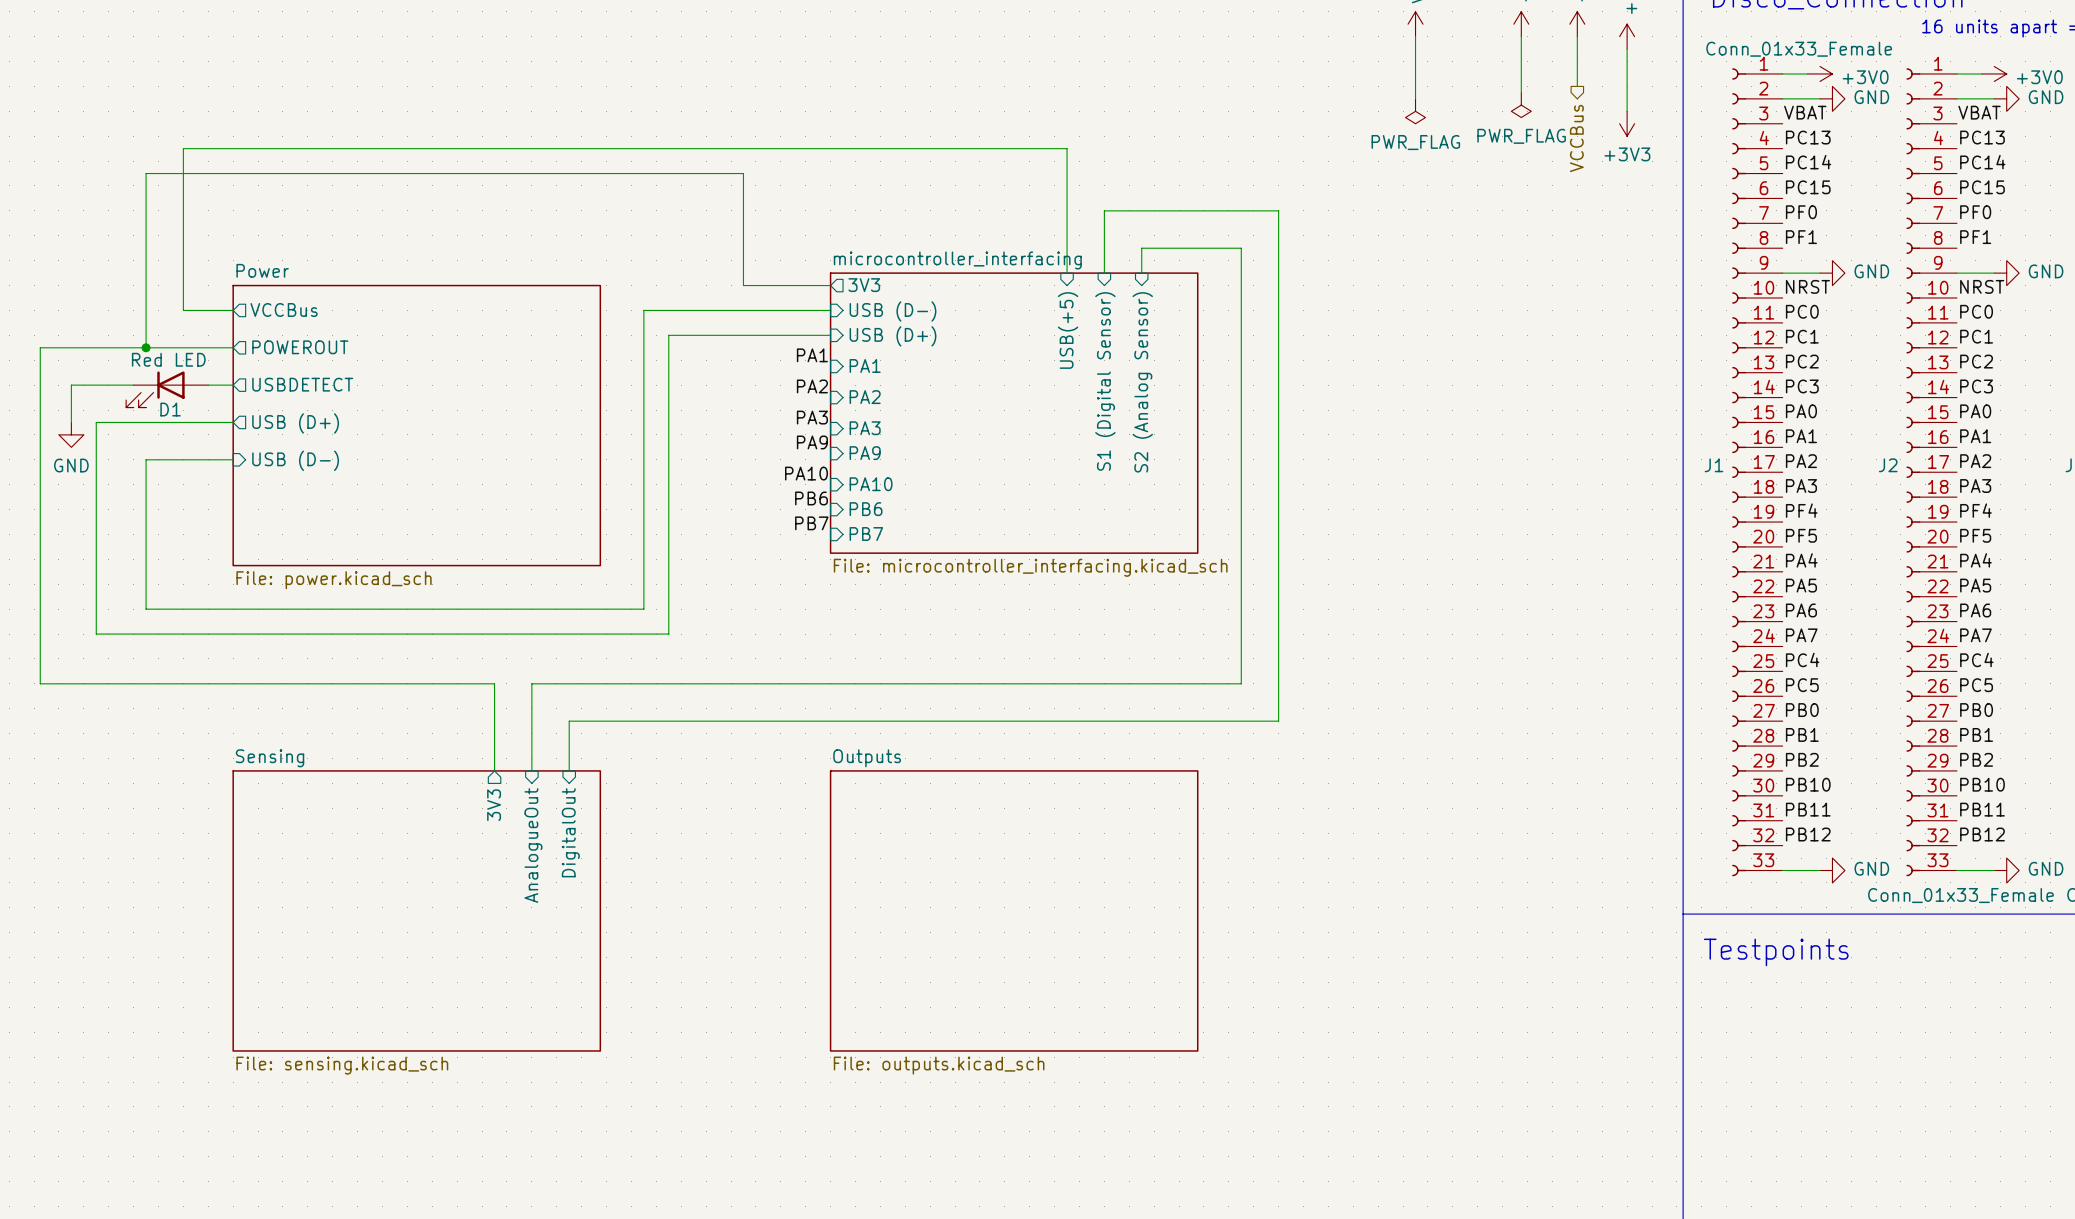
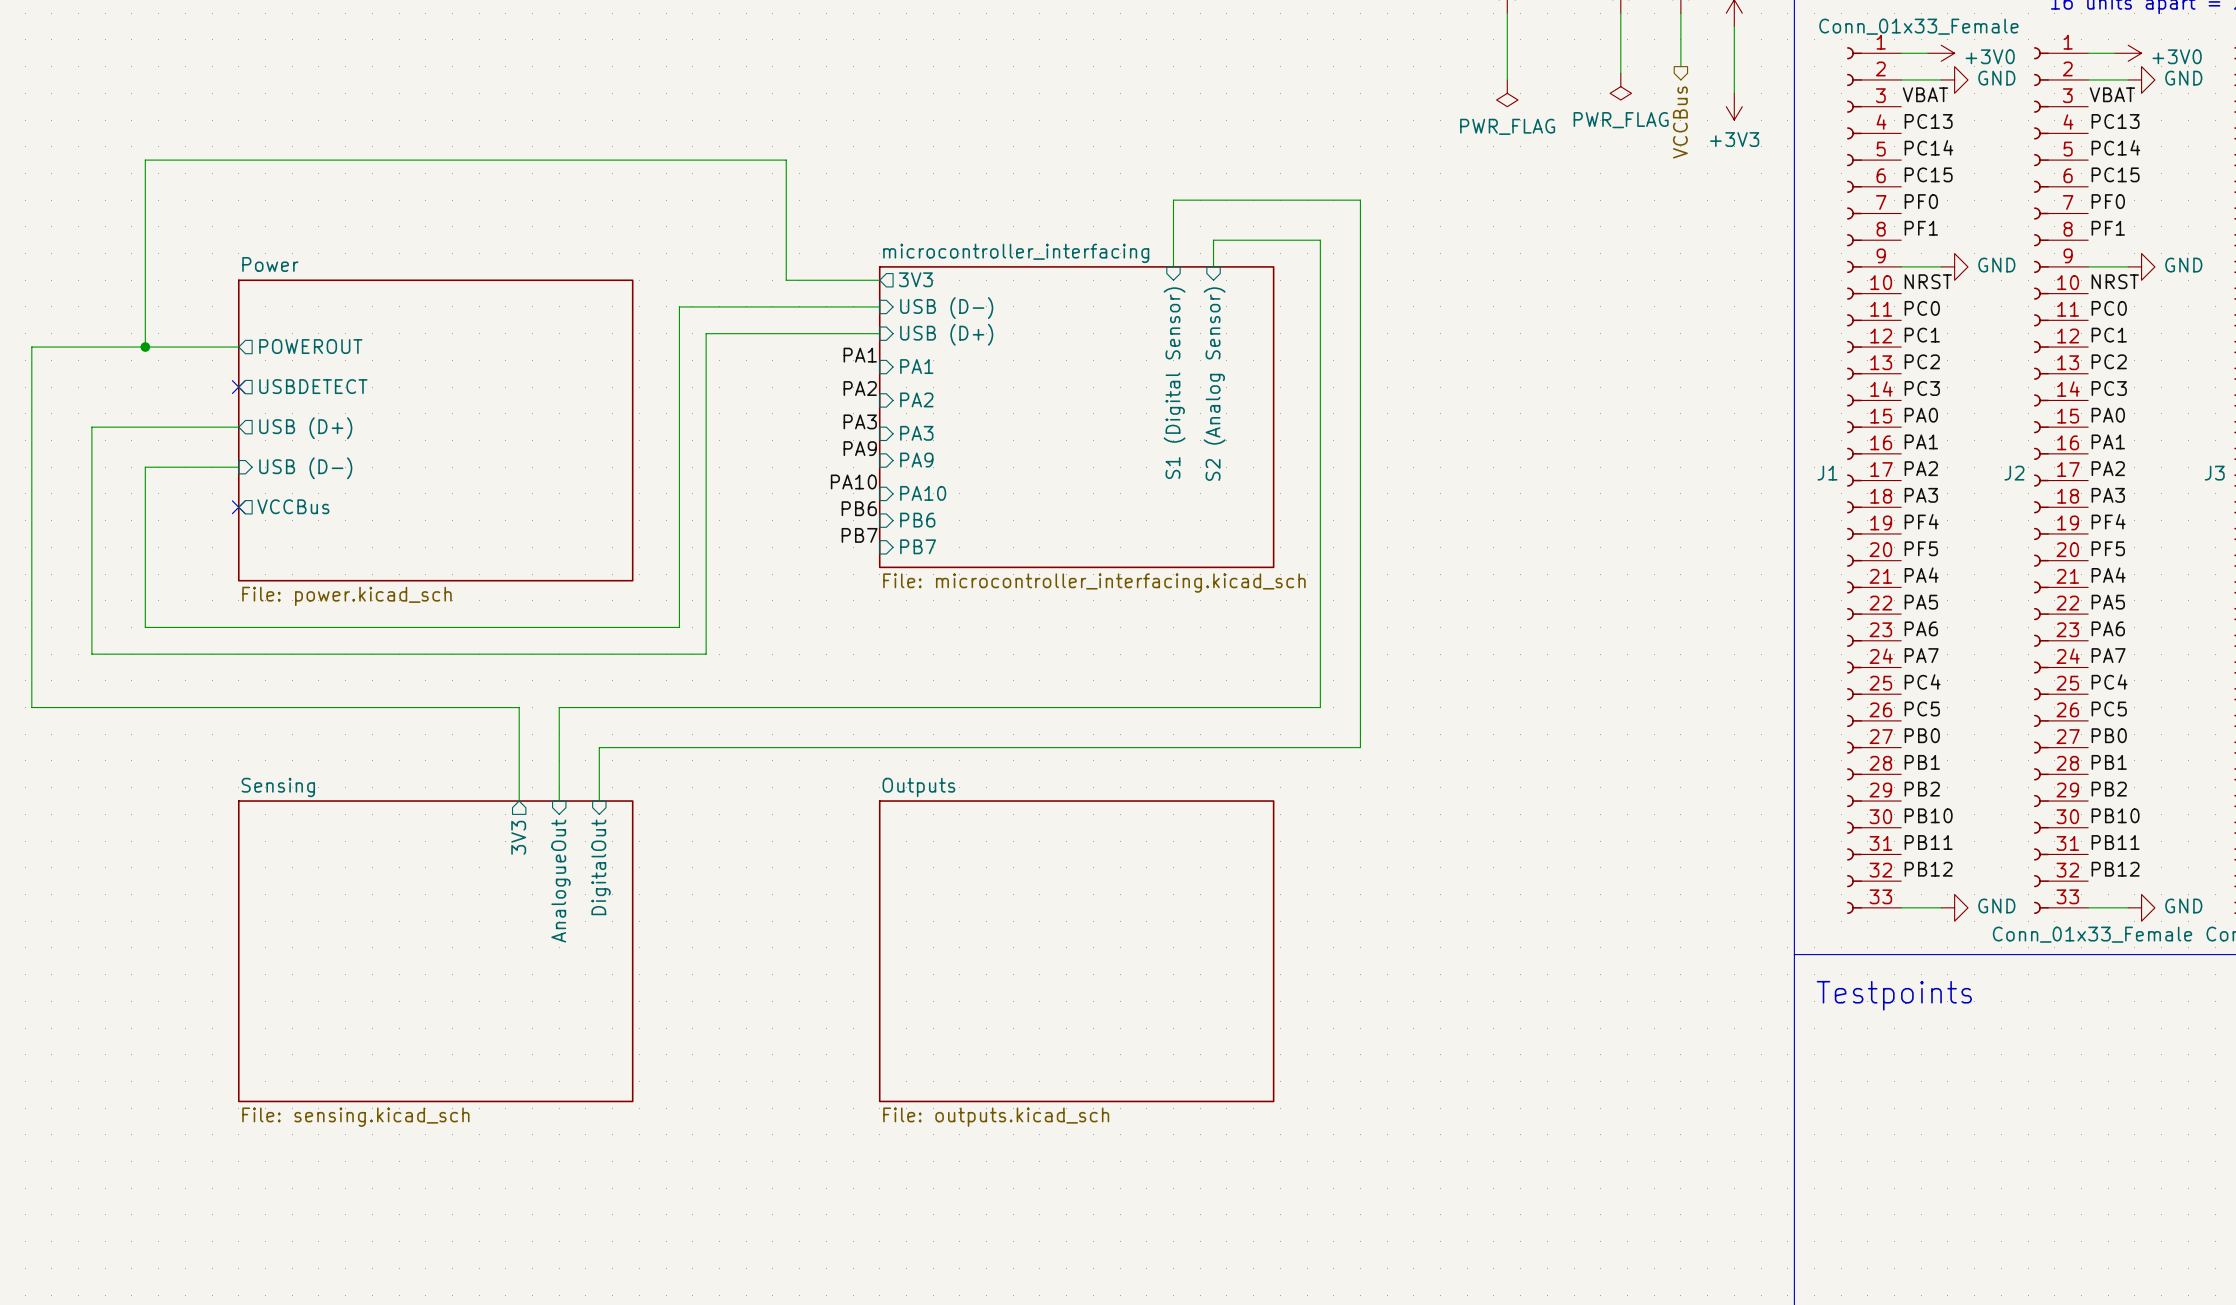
wire: (1067, 273) (1067, 148) (183, 148) (183, 310) (233, 310) -> none
sheet pin position: VCCBus (284, 309) -> VCCBus (293, 506)
sheet pin: USB(+5) (1068, 330) -> none
wire: (133, 385) (71, 385) (71, 422) -> none
wire: (208, 385) (233, 385) -> none
no-connect mark: none -> (238, 387)
D1: Red LED (167, 389) -> none
power symbol: GND (71, 434) -> none
no-connect mark: none -> (238, 507)

